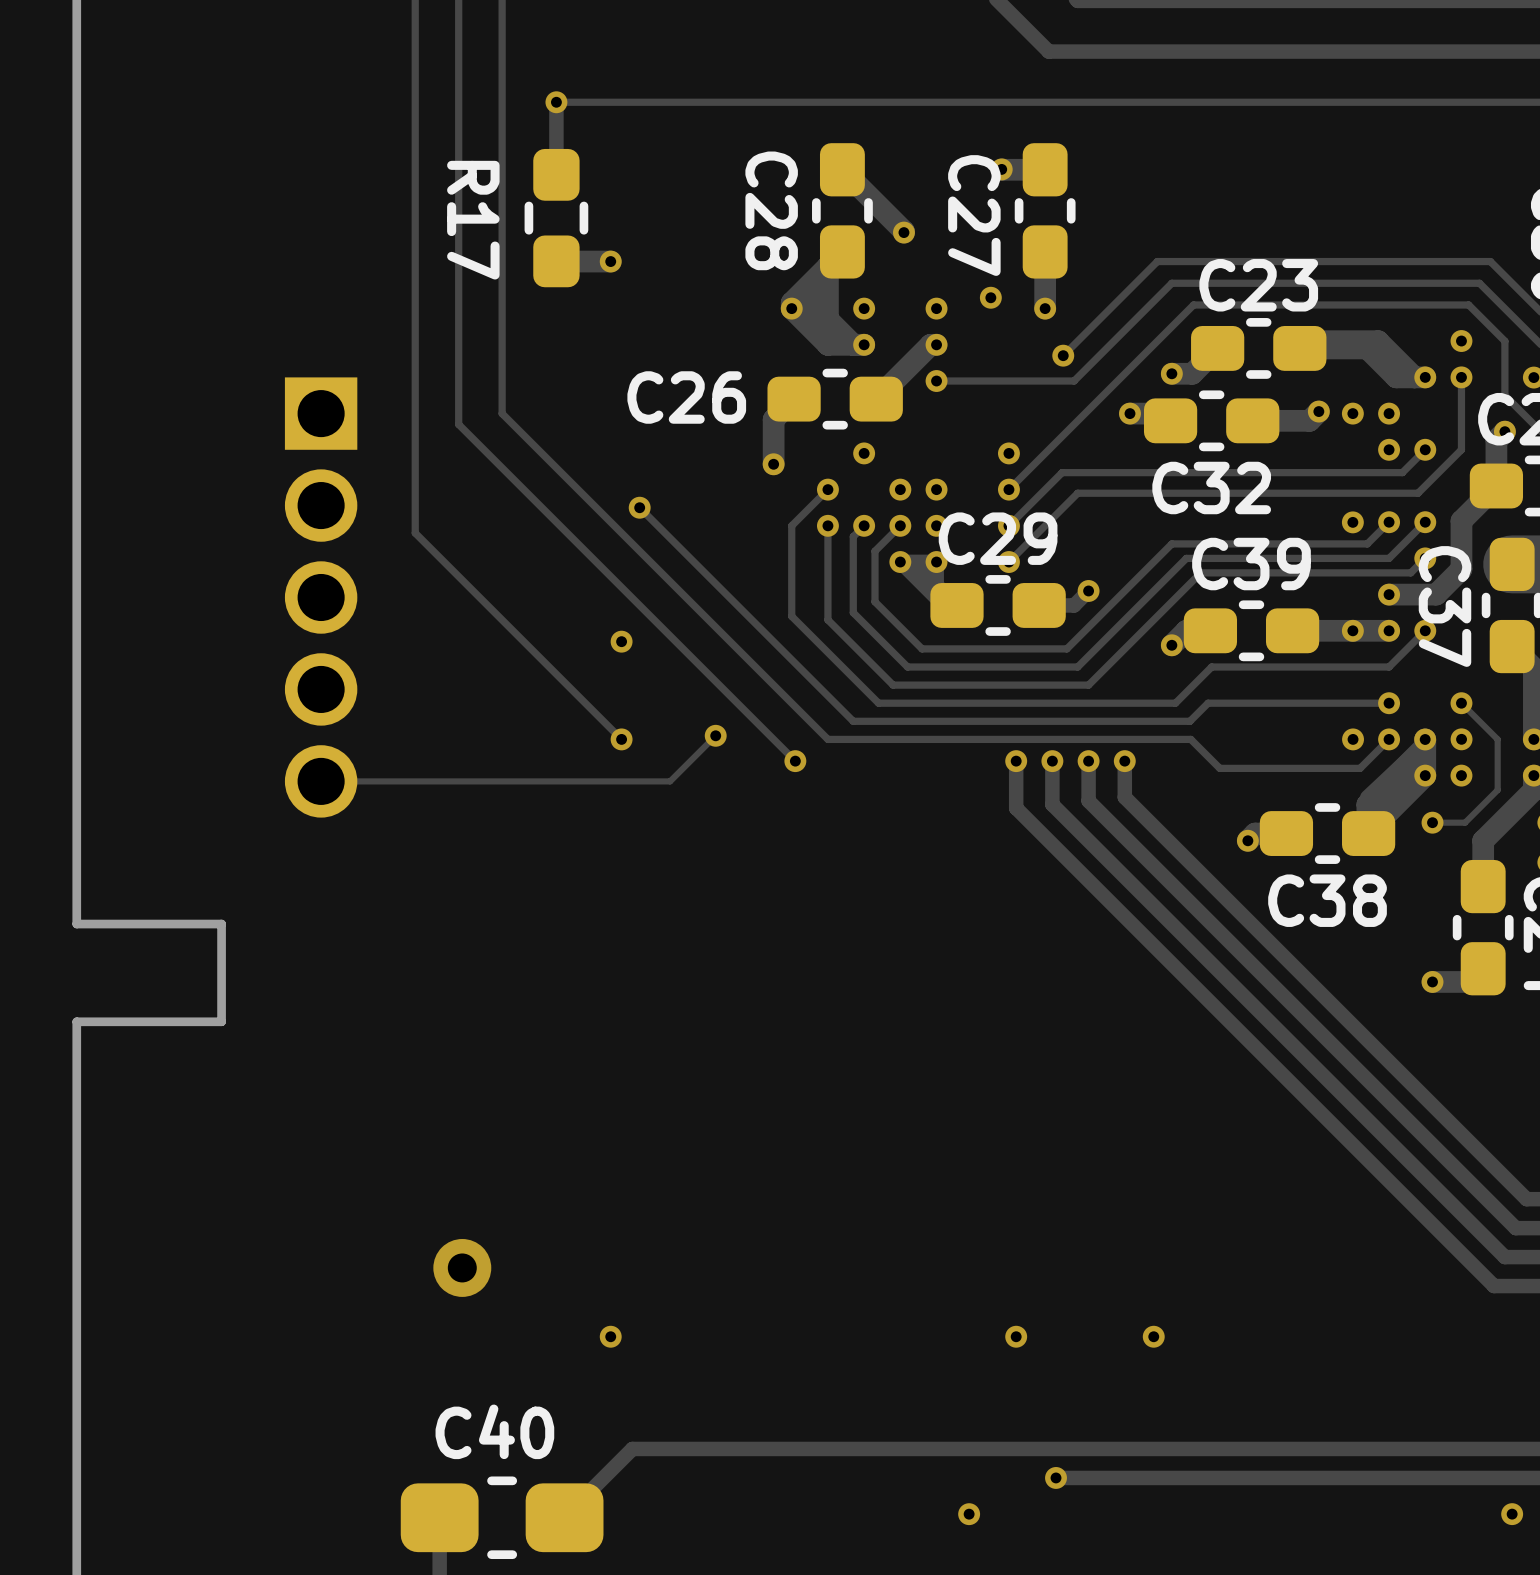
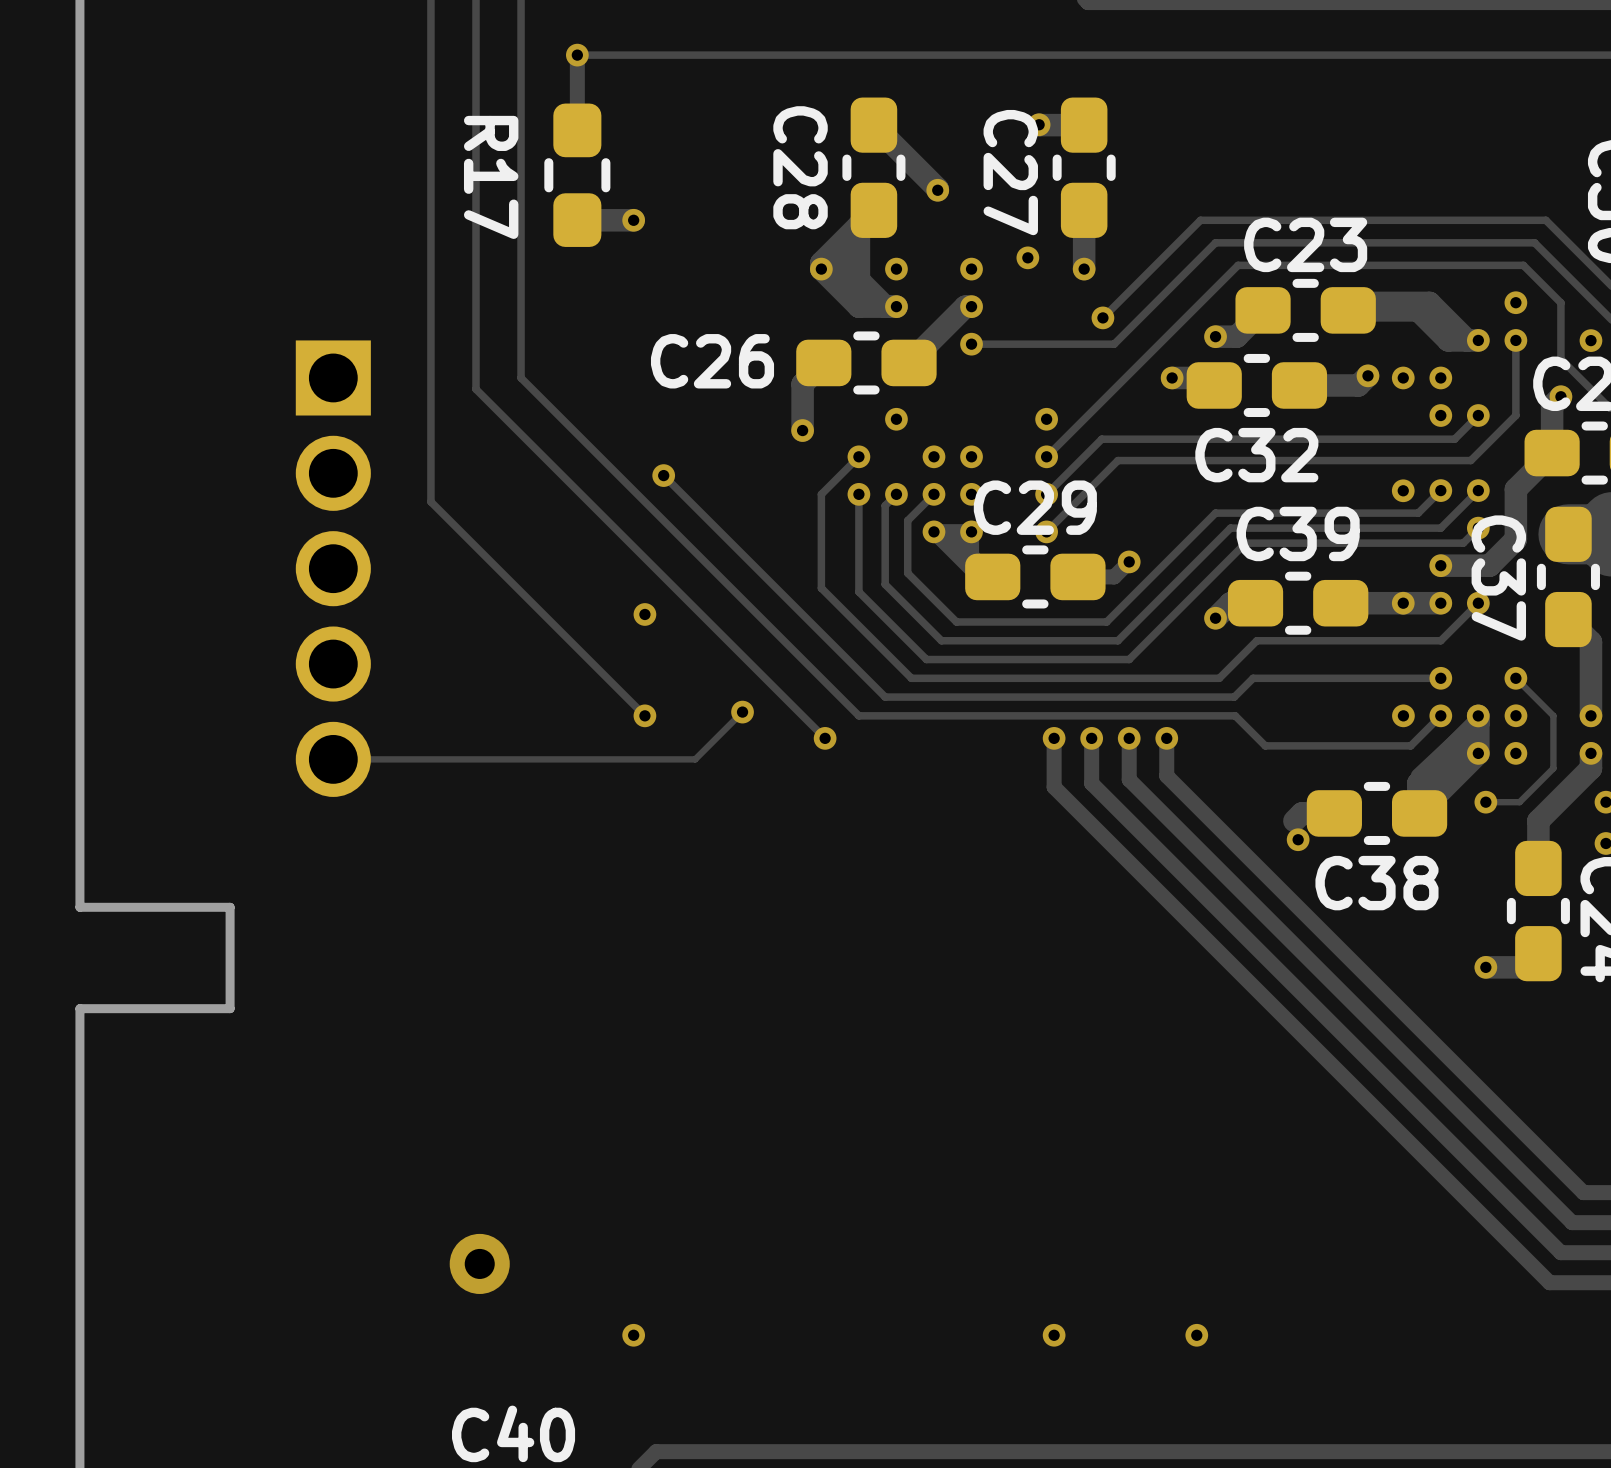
via position: (1247, 840) -> (1298, 839)

